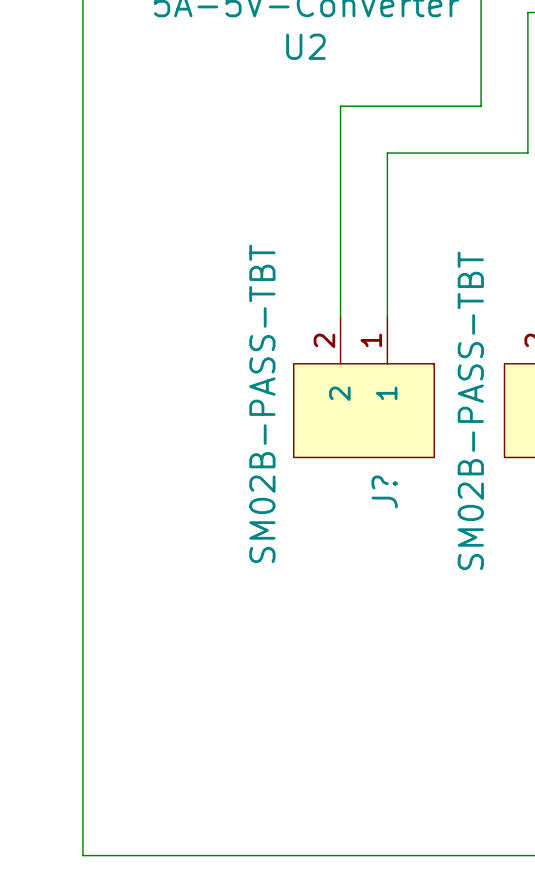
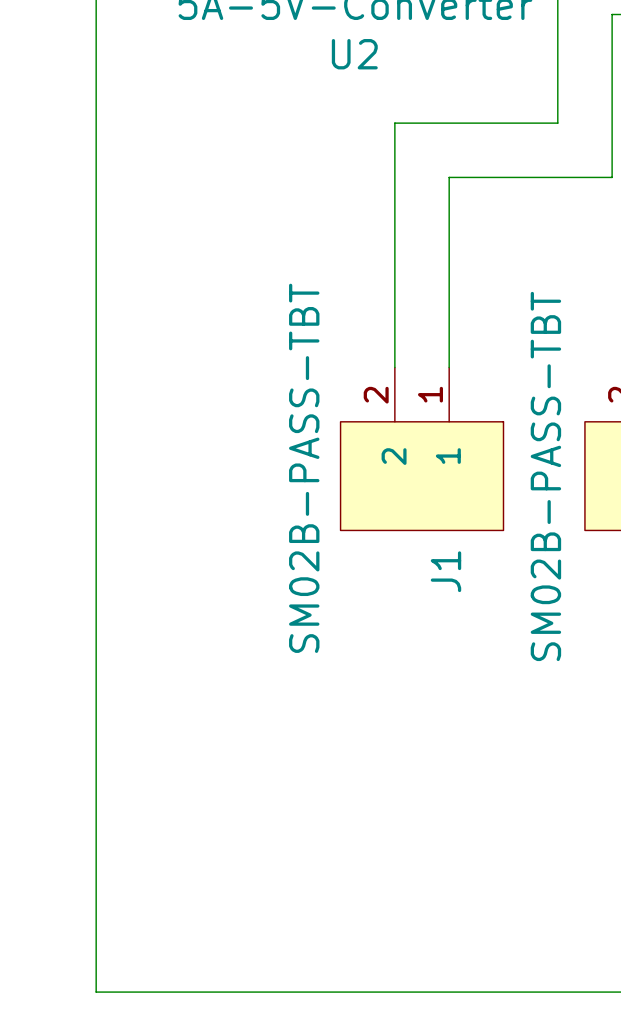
J? name: J? (384, 491) -> J1 (445, 571)

